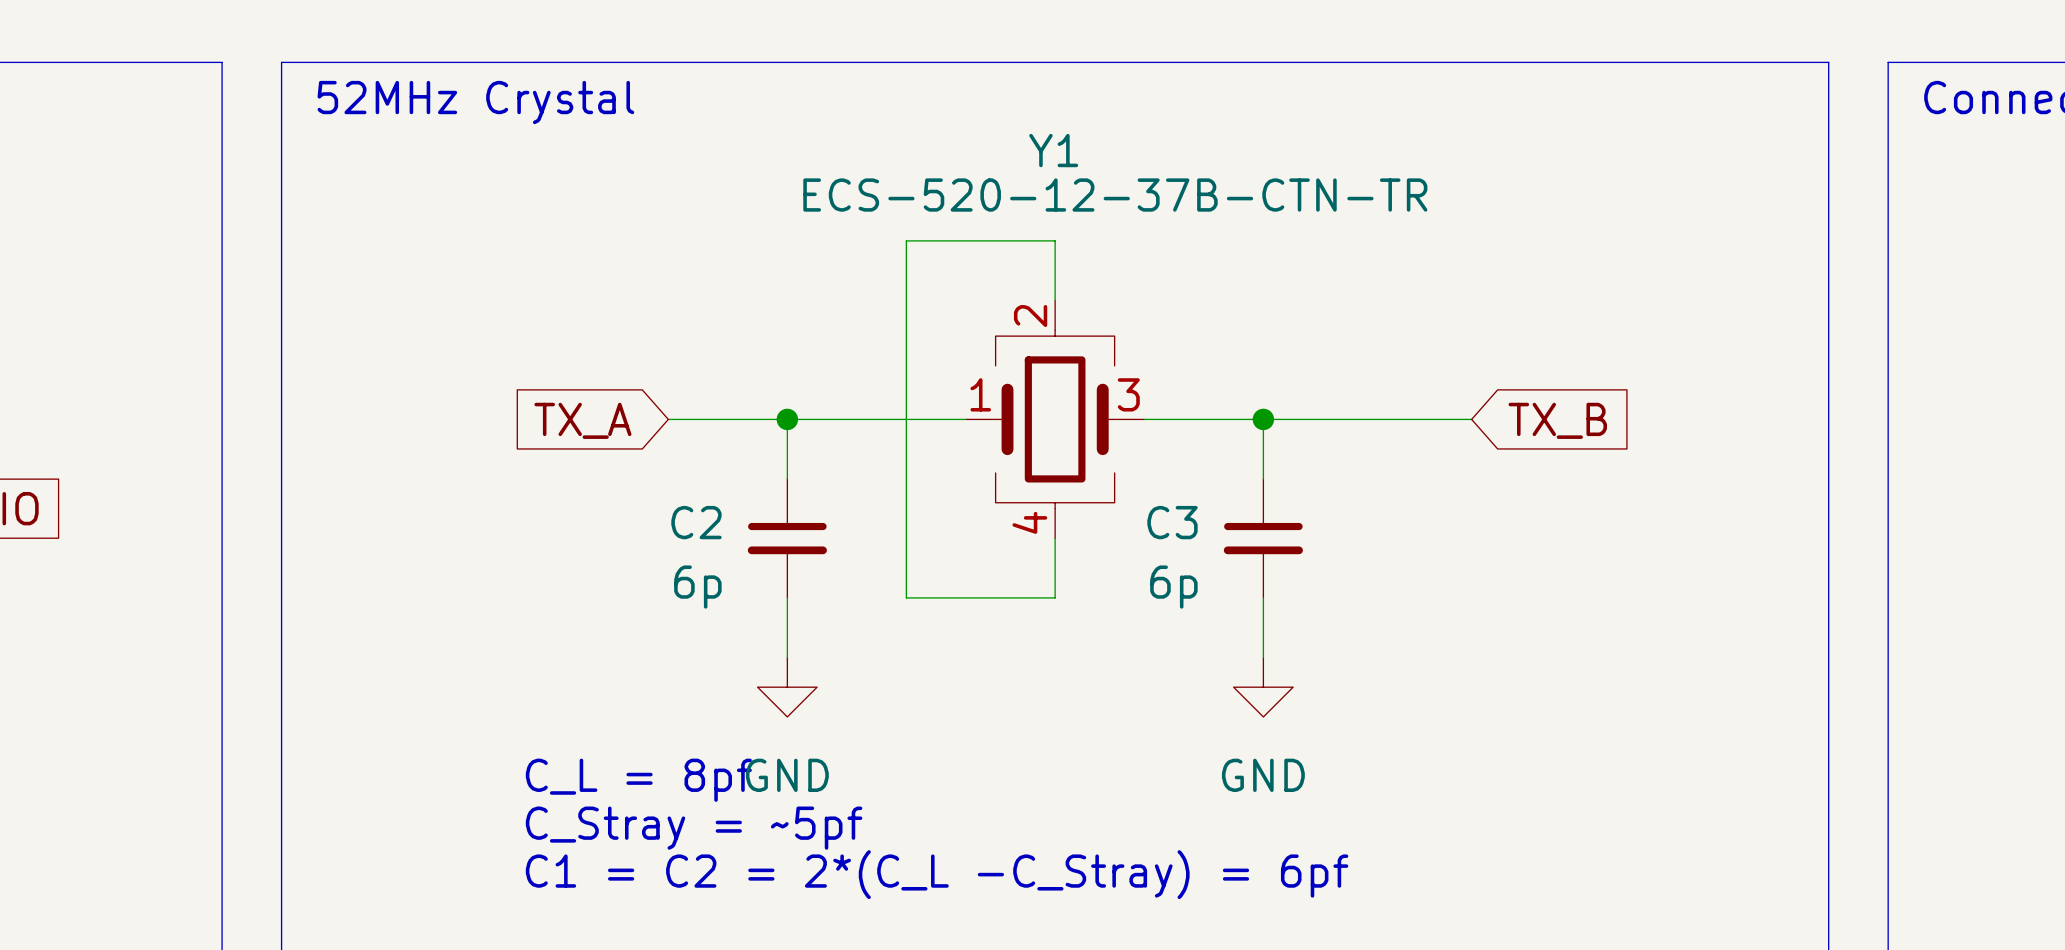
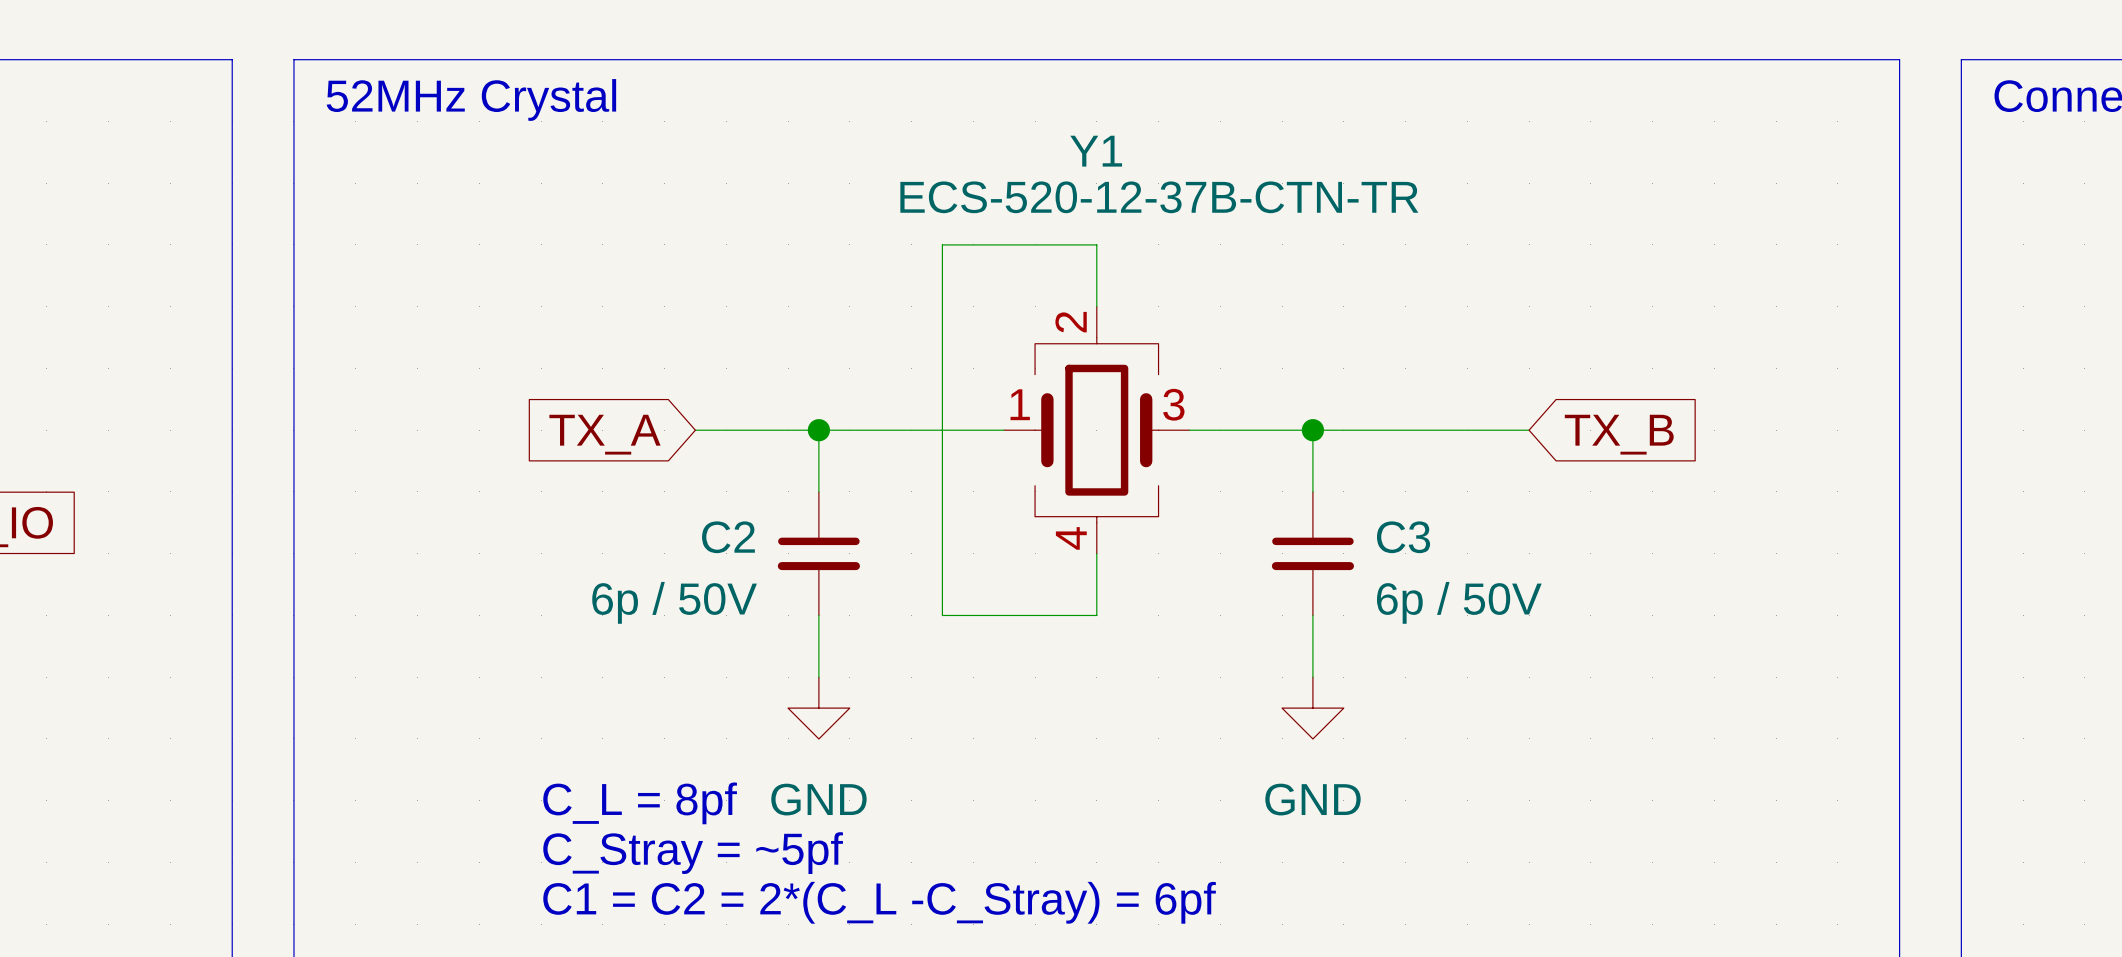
C3 name position: C3 (1172, 522) -> C3 (1403, 537)
C2 value: 6p (697, 587) -> 6p / 50V (674, 602)
C3 value: 6p (1173, 587) -> 6p / 50V (1459, 602)

